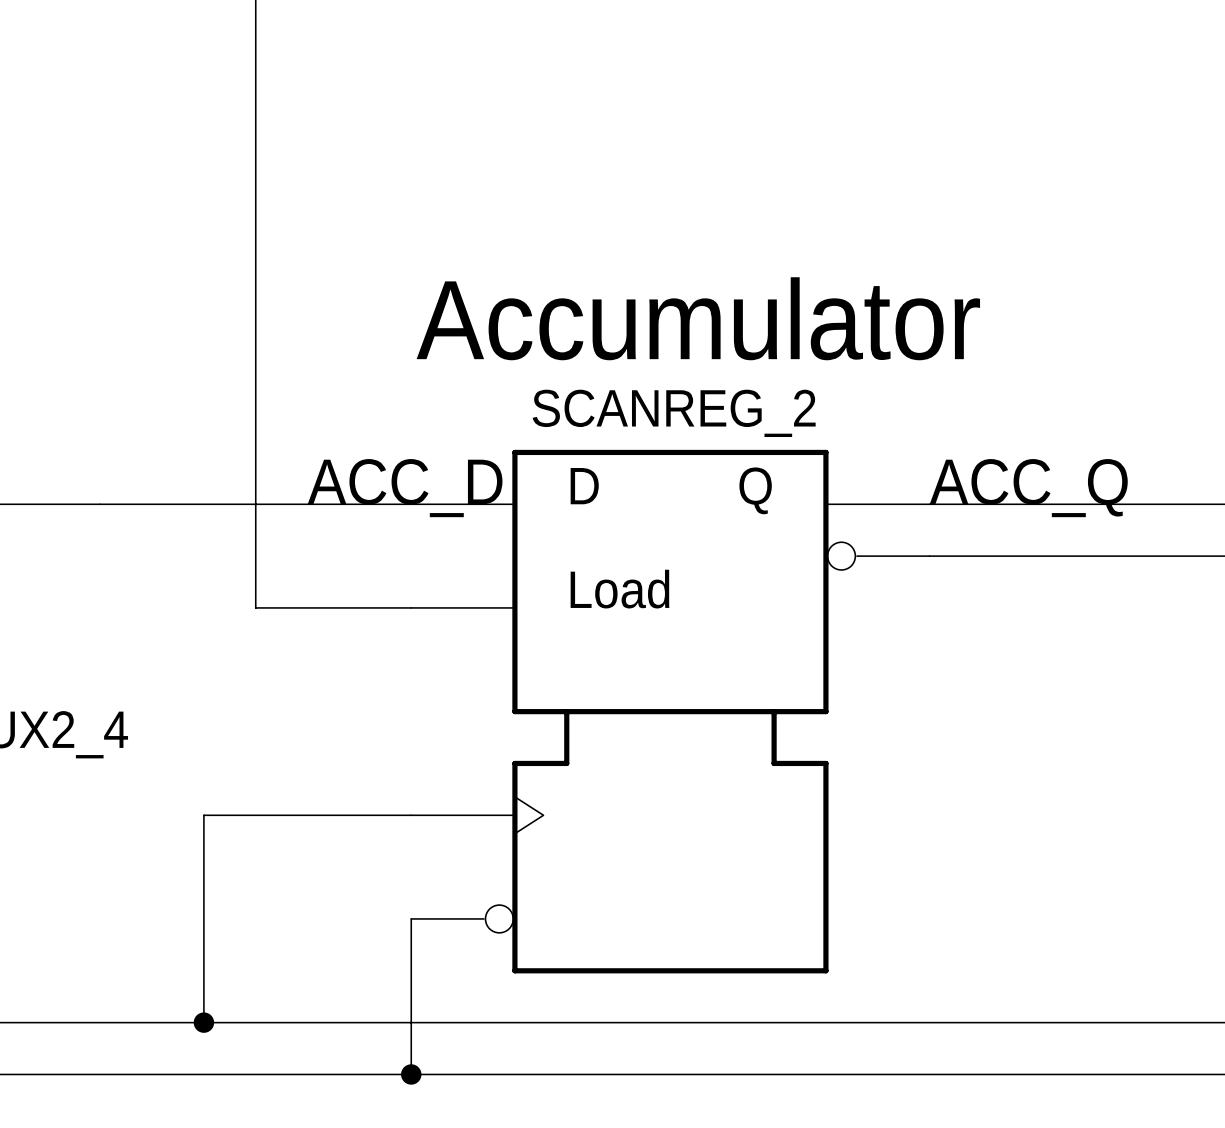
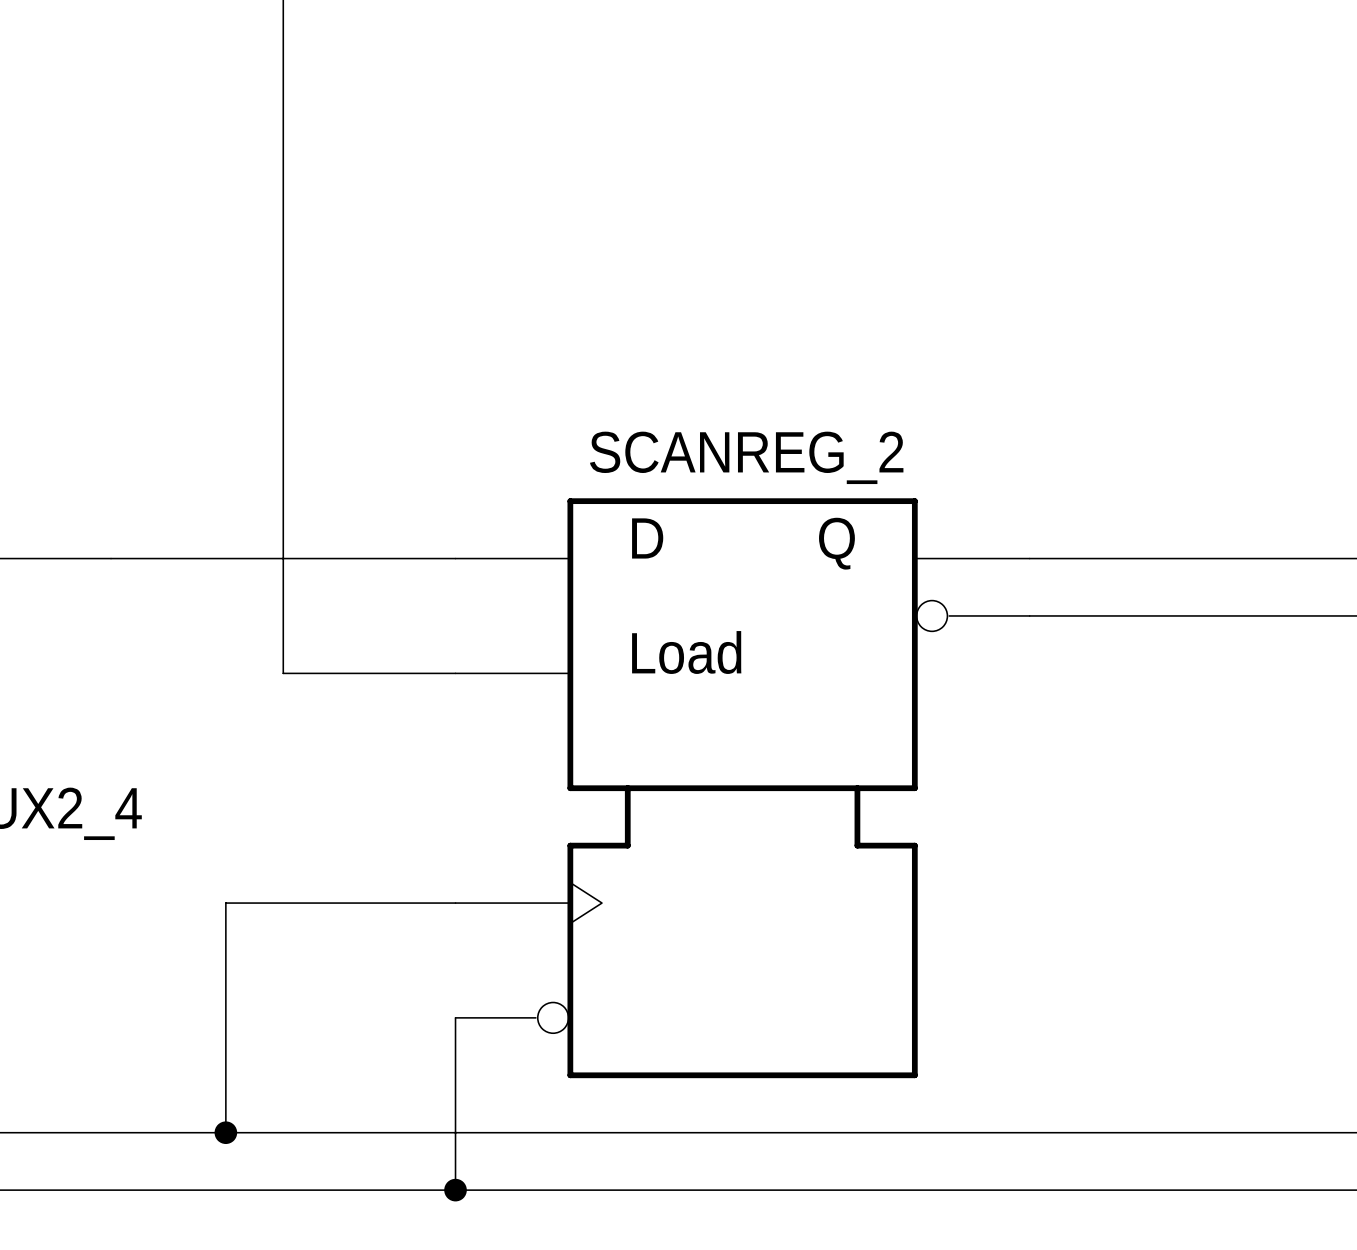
text: Accumulator (698, 318) -> none
label: ACC_D (405, 488) -> none
label: ACC_Q (1028, 488) -> none

